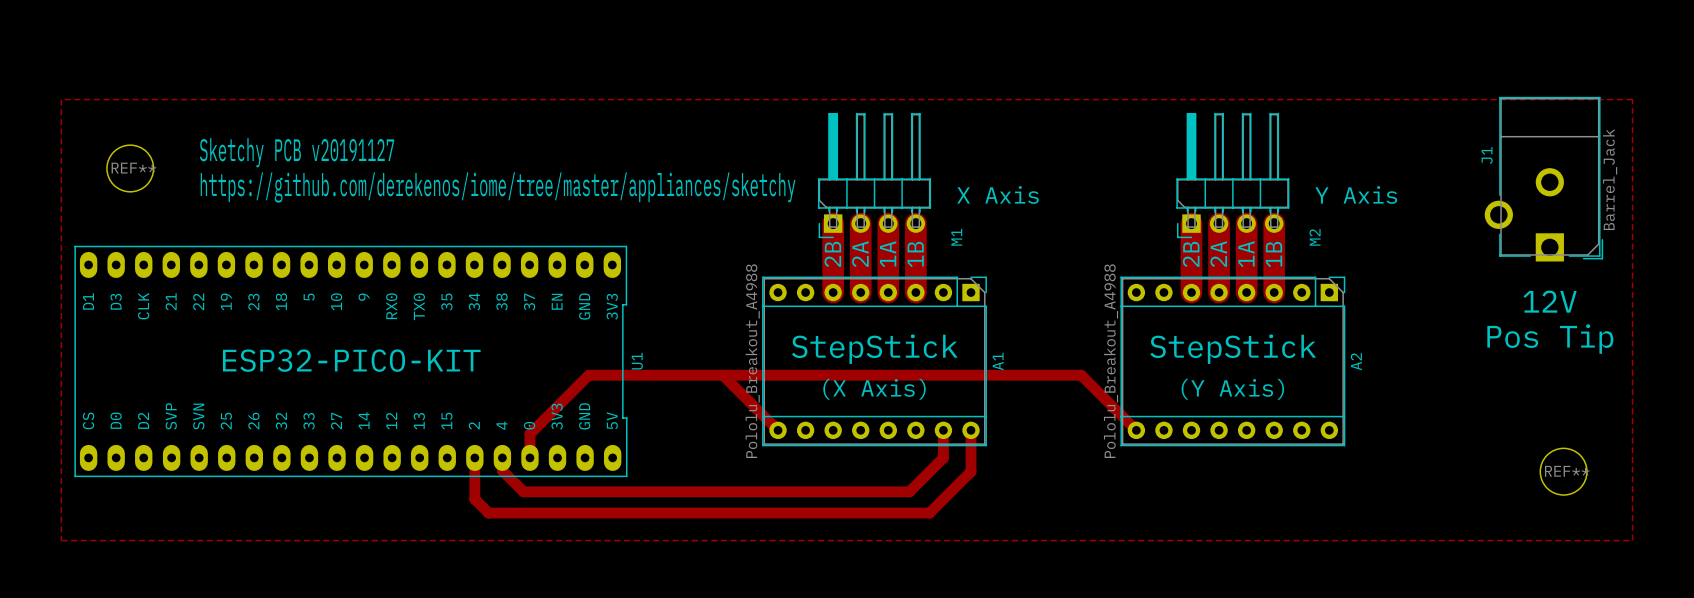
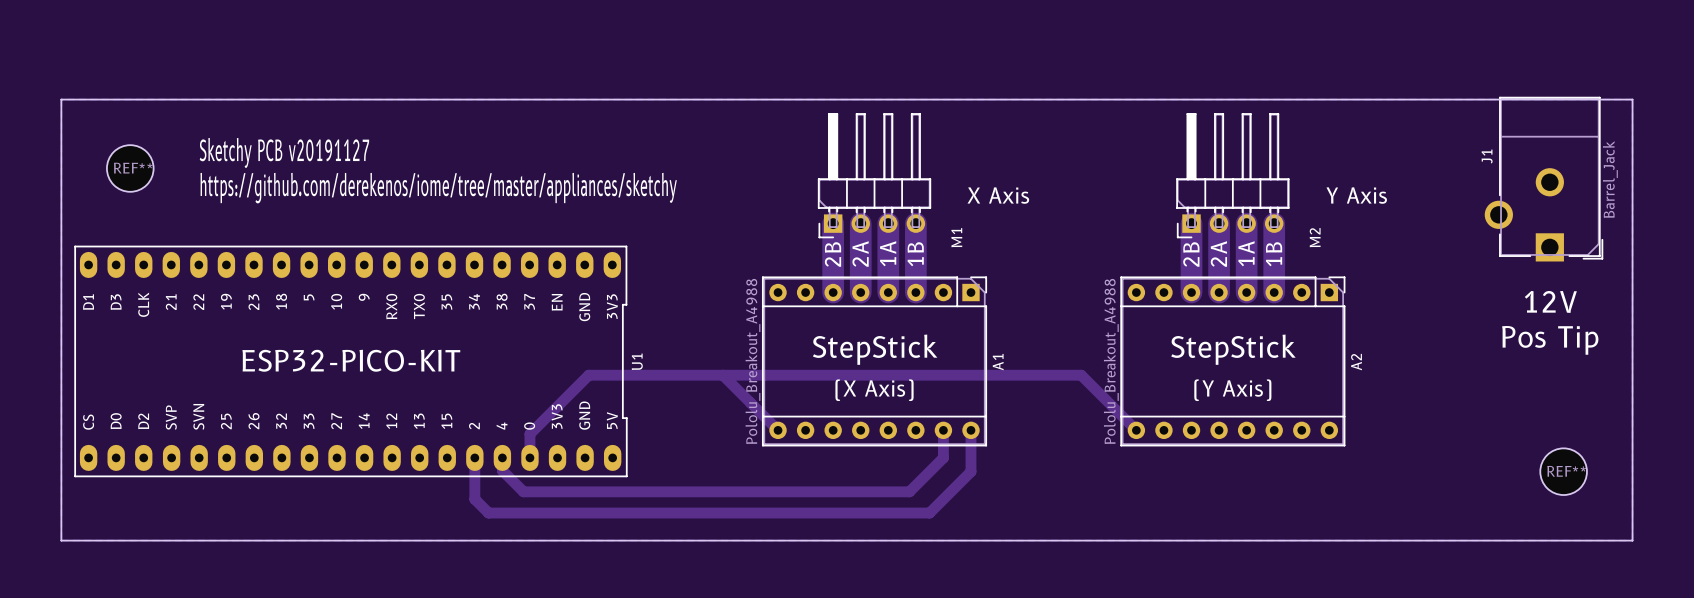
board edge: none -> (61, 99) (1632, 99) (1632, 540) (61, 540) (61, 99)

